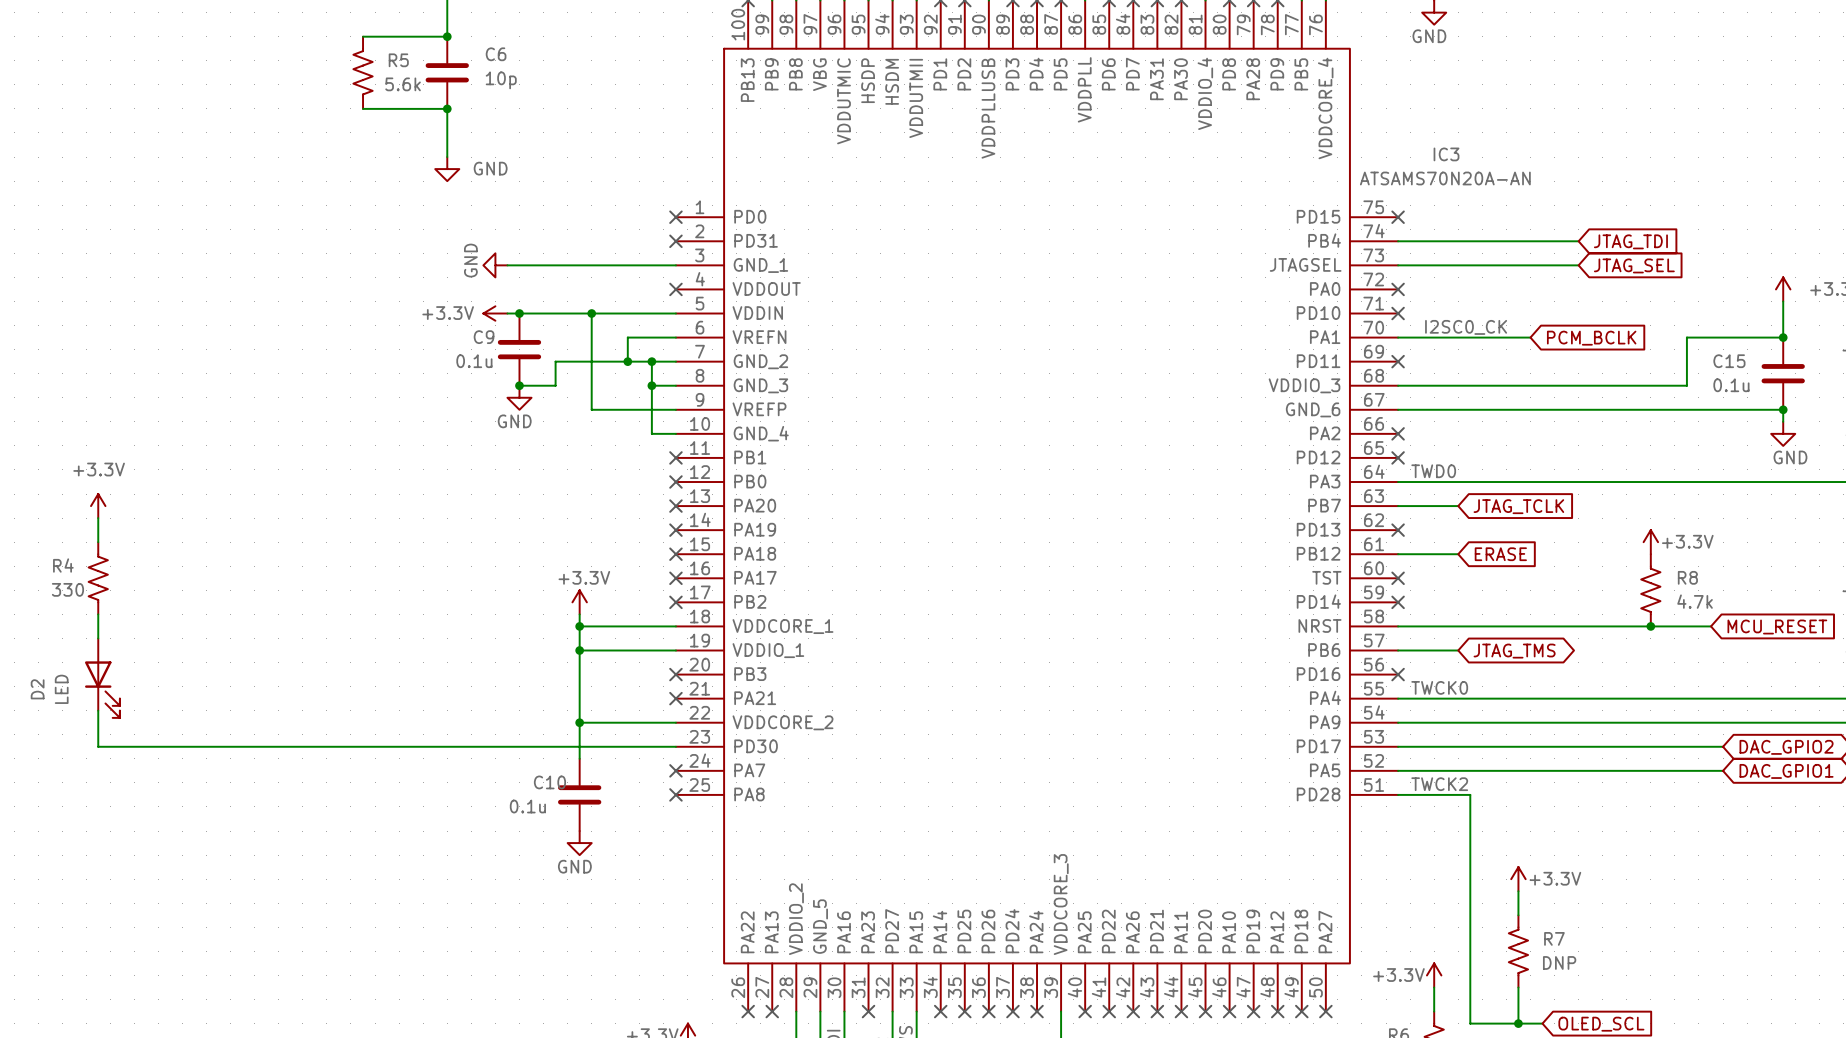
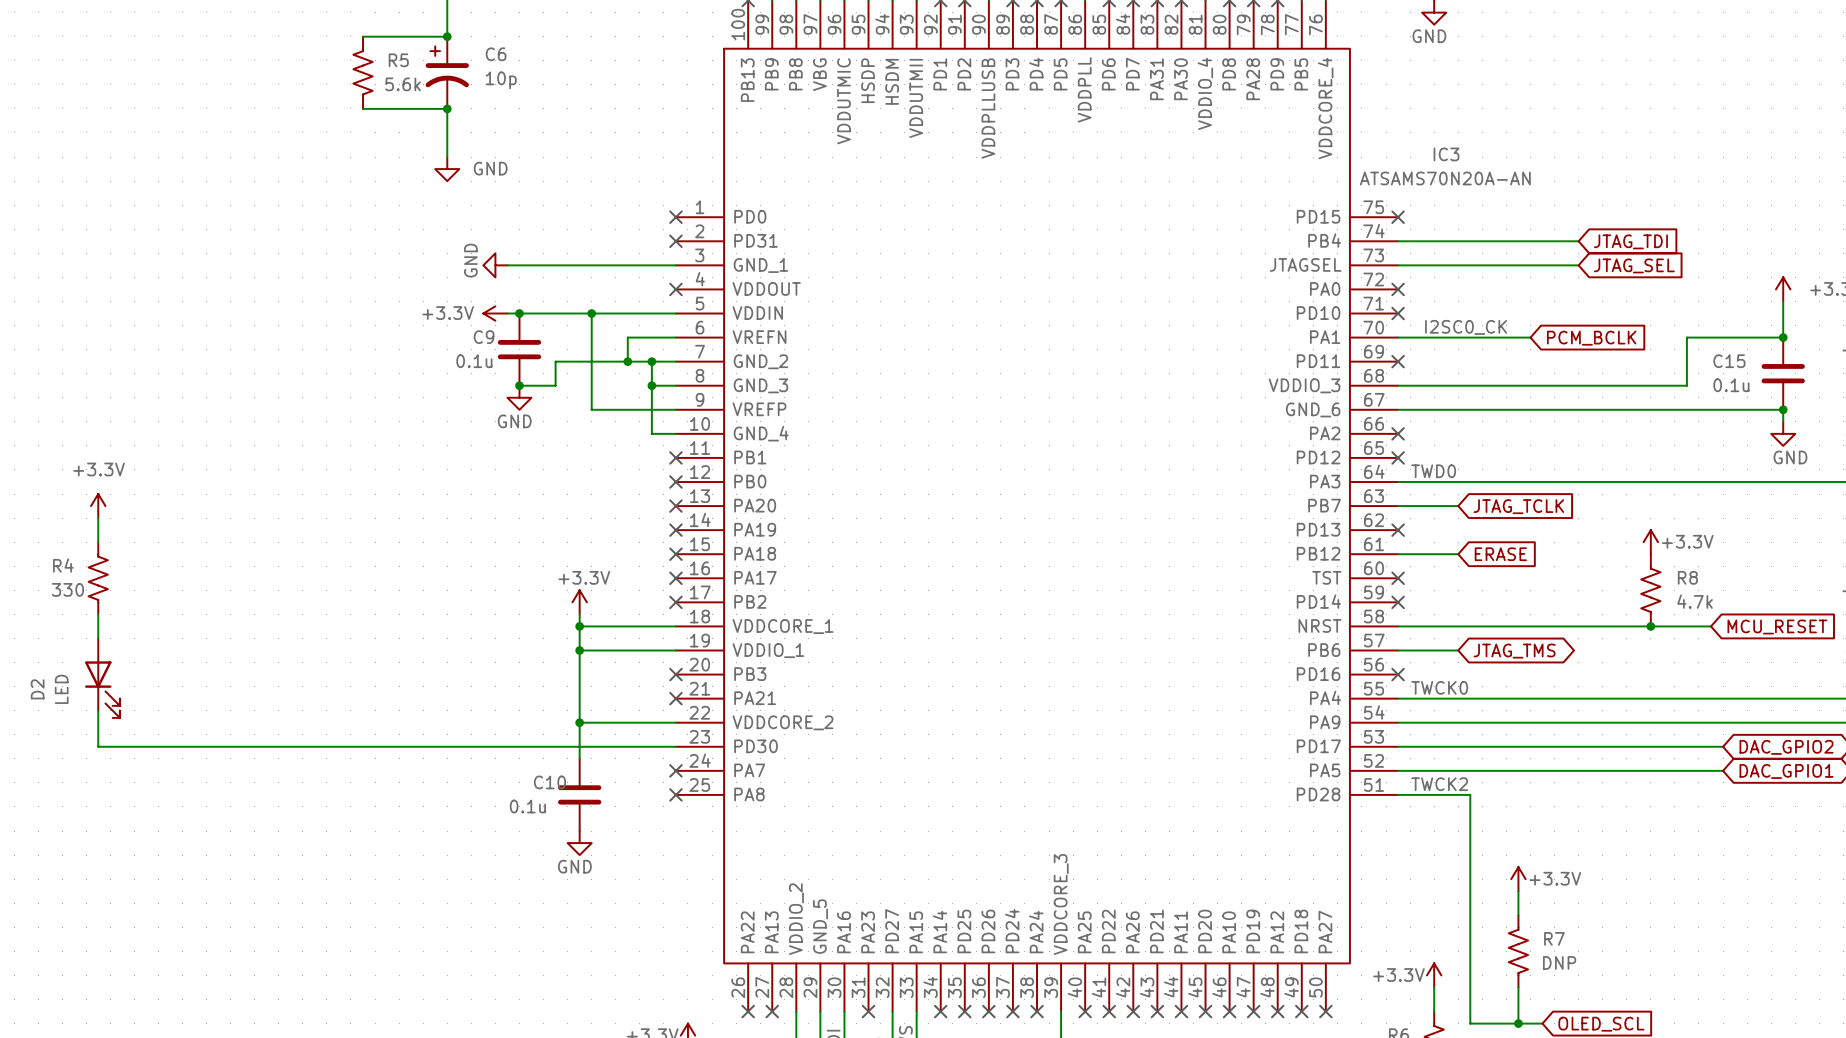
C6 symbol: [425, 36, 469, 109] -> [425, 36, 469, 109]

